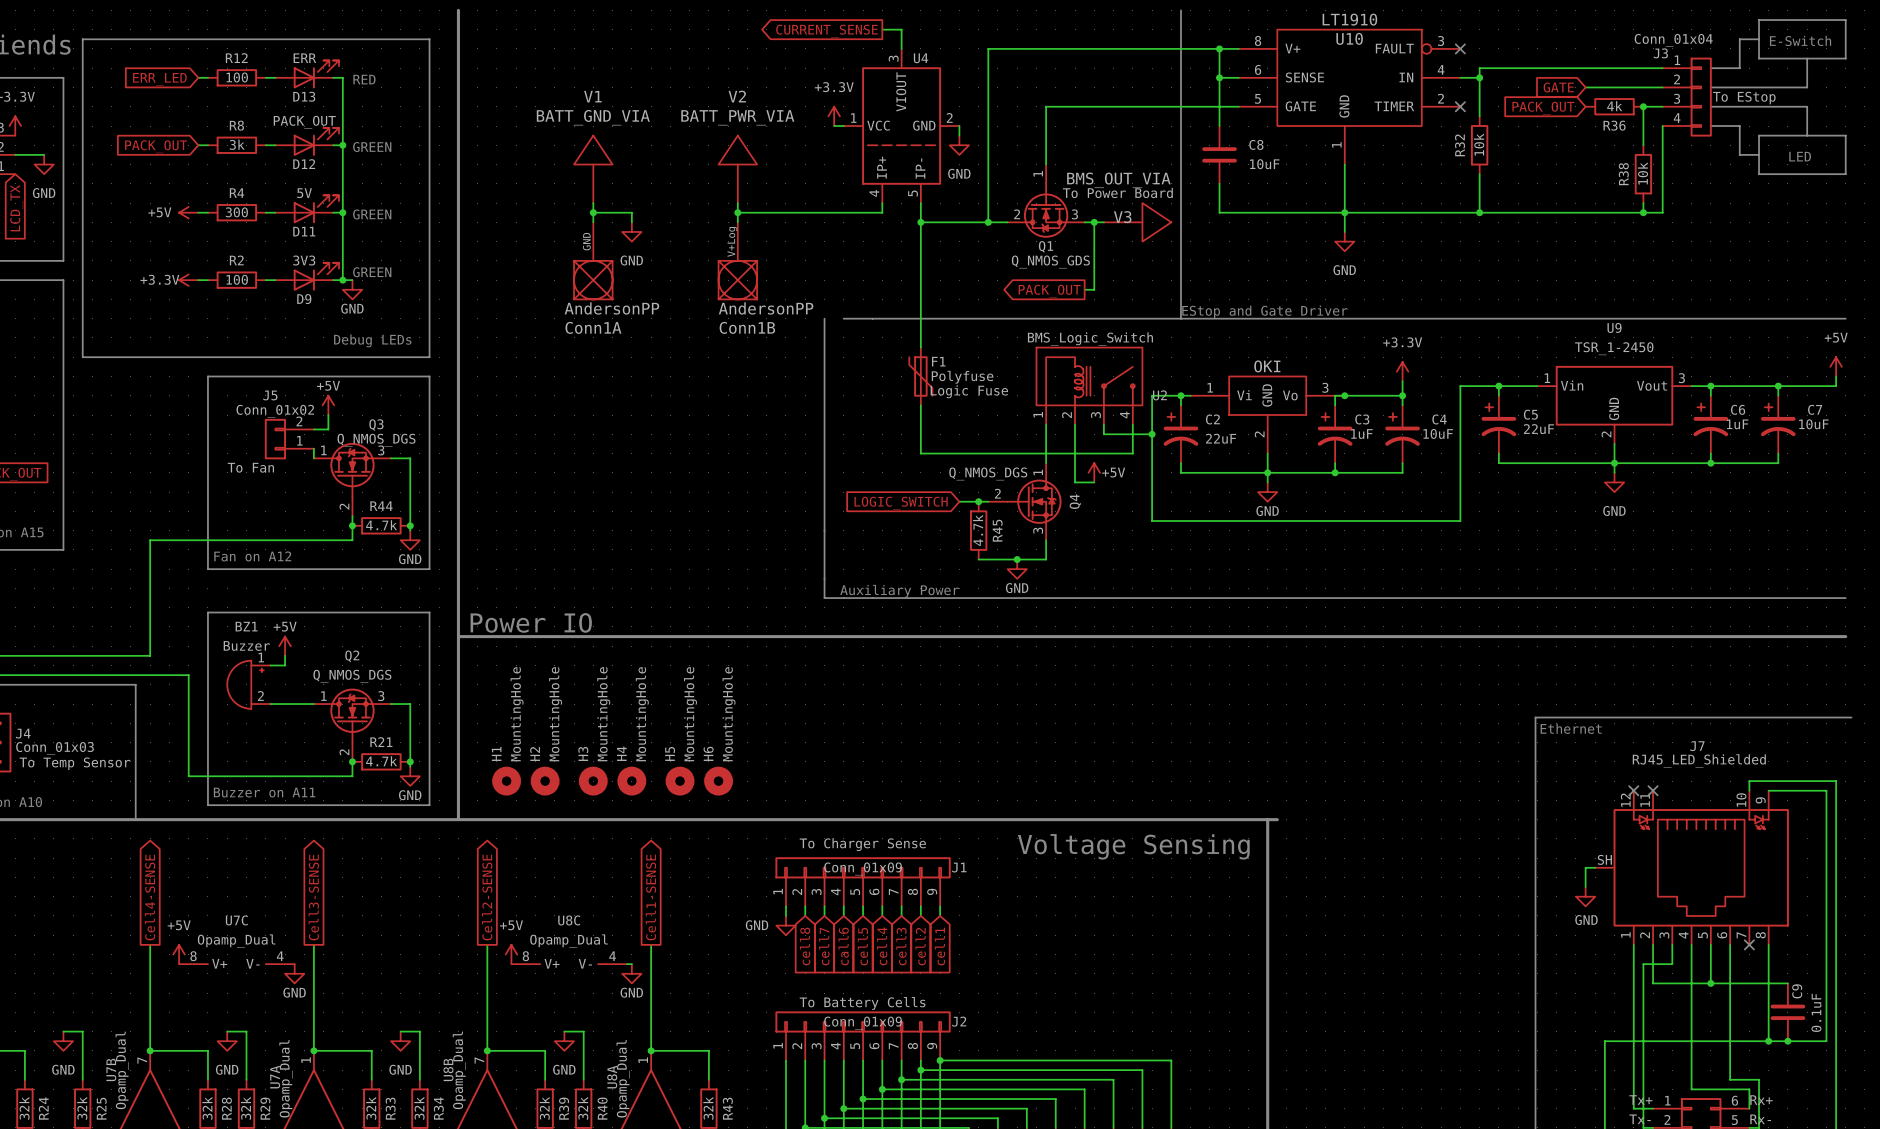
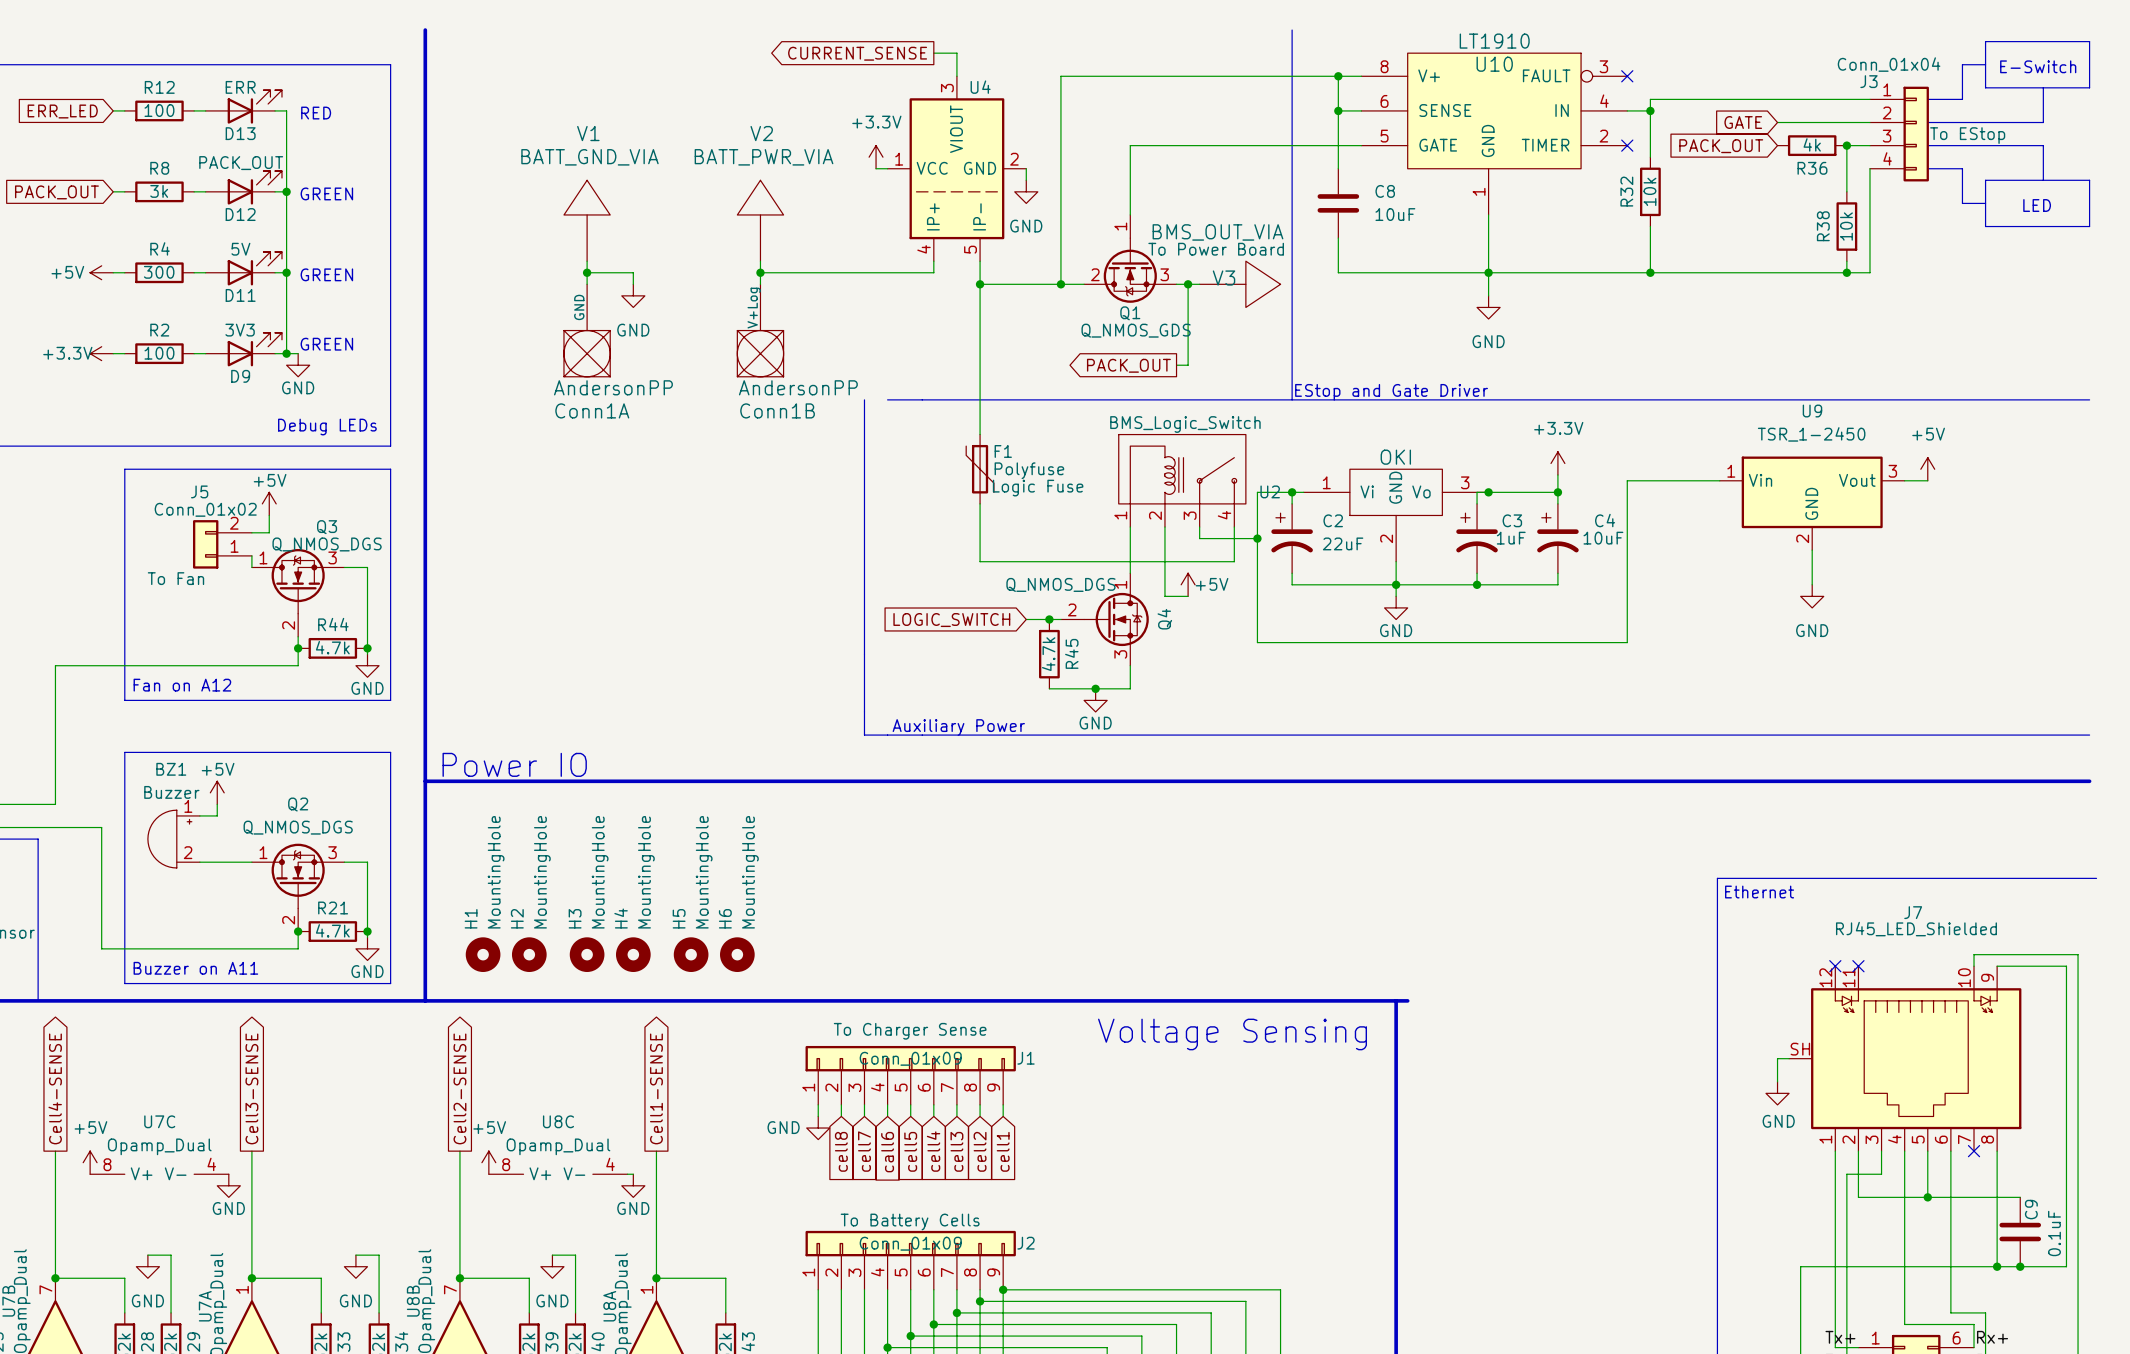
power symbol position: +5V (1836, 366) -> +5V (1927, 469)
wire: (1836, 376) (1836, 386) (1710, 386) (1710, 395) -> none
wire: (1498, 386) (1498, 395) -> none
junction: (1498, 386) -> none
junction: (1710, 386) -> none
wire: (1778, 386) (1778, 395) -> none
junction: (1778, 386) -> none
C5: 22uF (1498, 424) -> none
C6: 1uF (1710, 424) -> none
C7: 10uF (1778, 424) -> none
wire: (1498, 453) (1498, 463) (1778, 463) (1778, 453) -> none
wire: (1710, 453) (1710, 463) -> none
junction: (1614, 463) -> none
junction: (1710, 463) -> none

